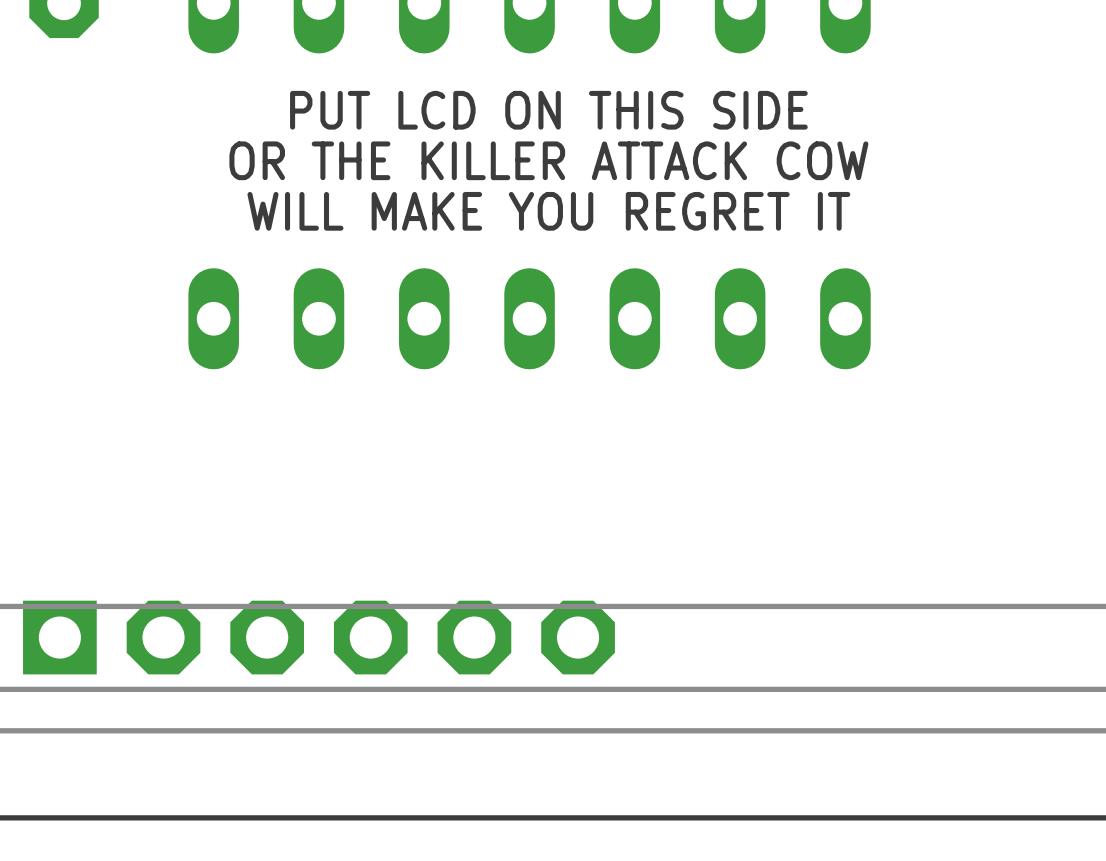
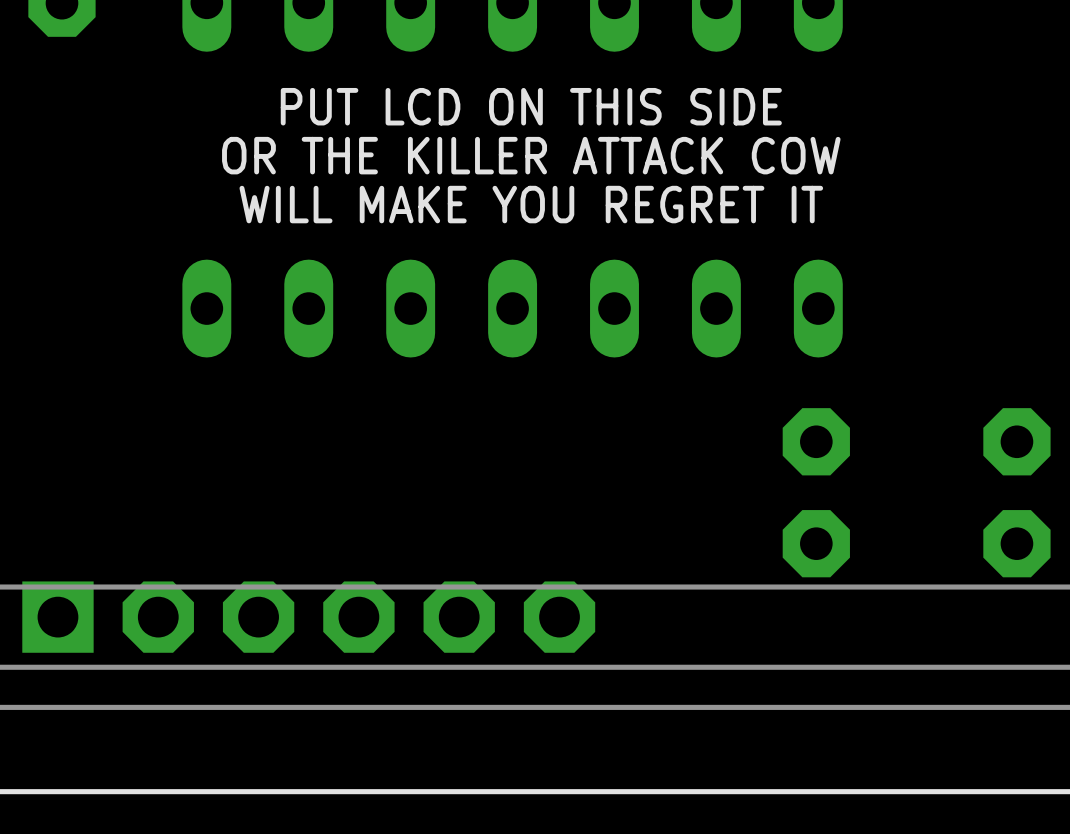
part: none -> (816, 492)
part: none -> (1016, 492)

